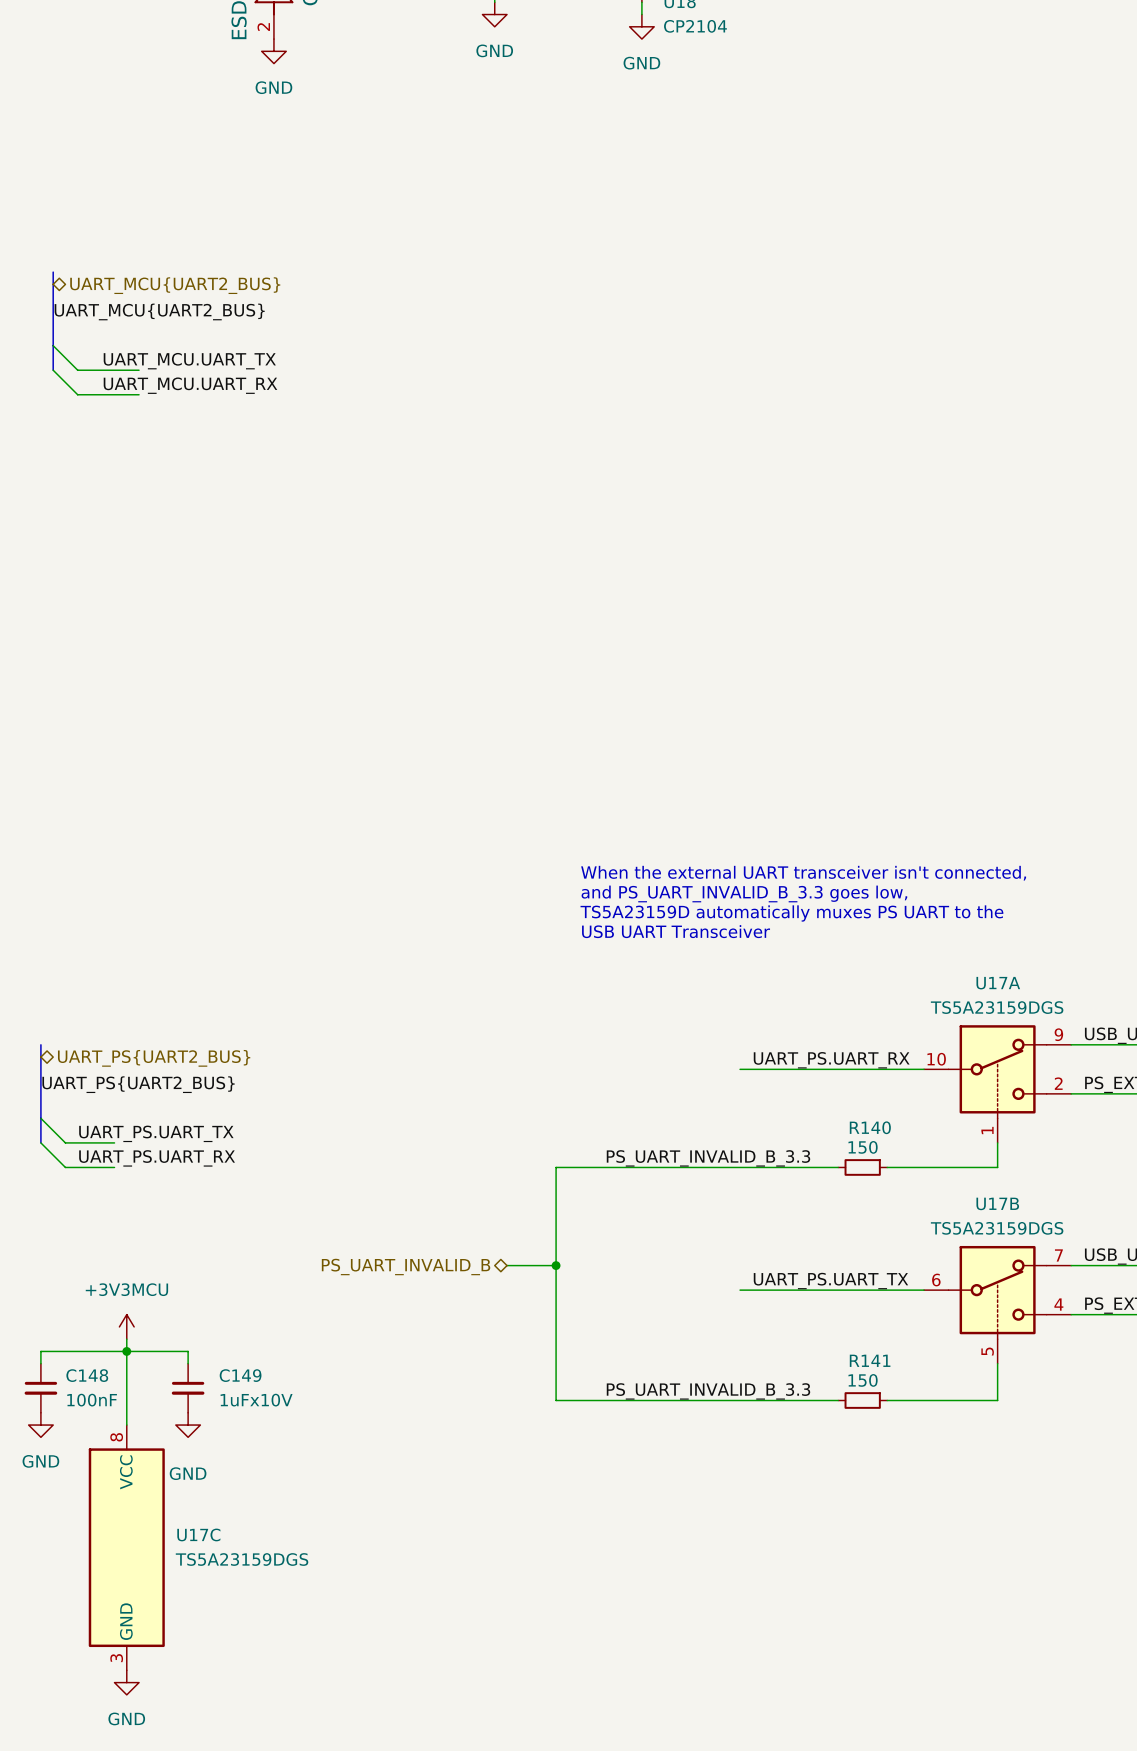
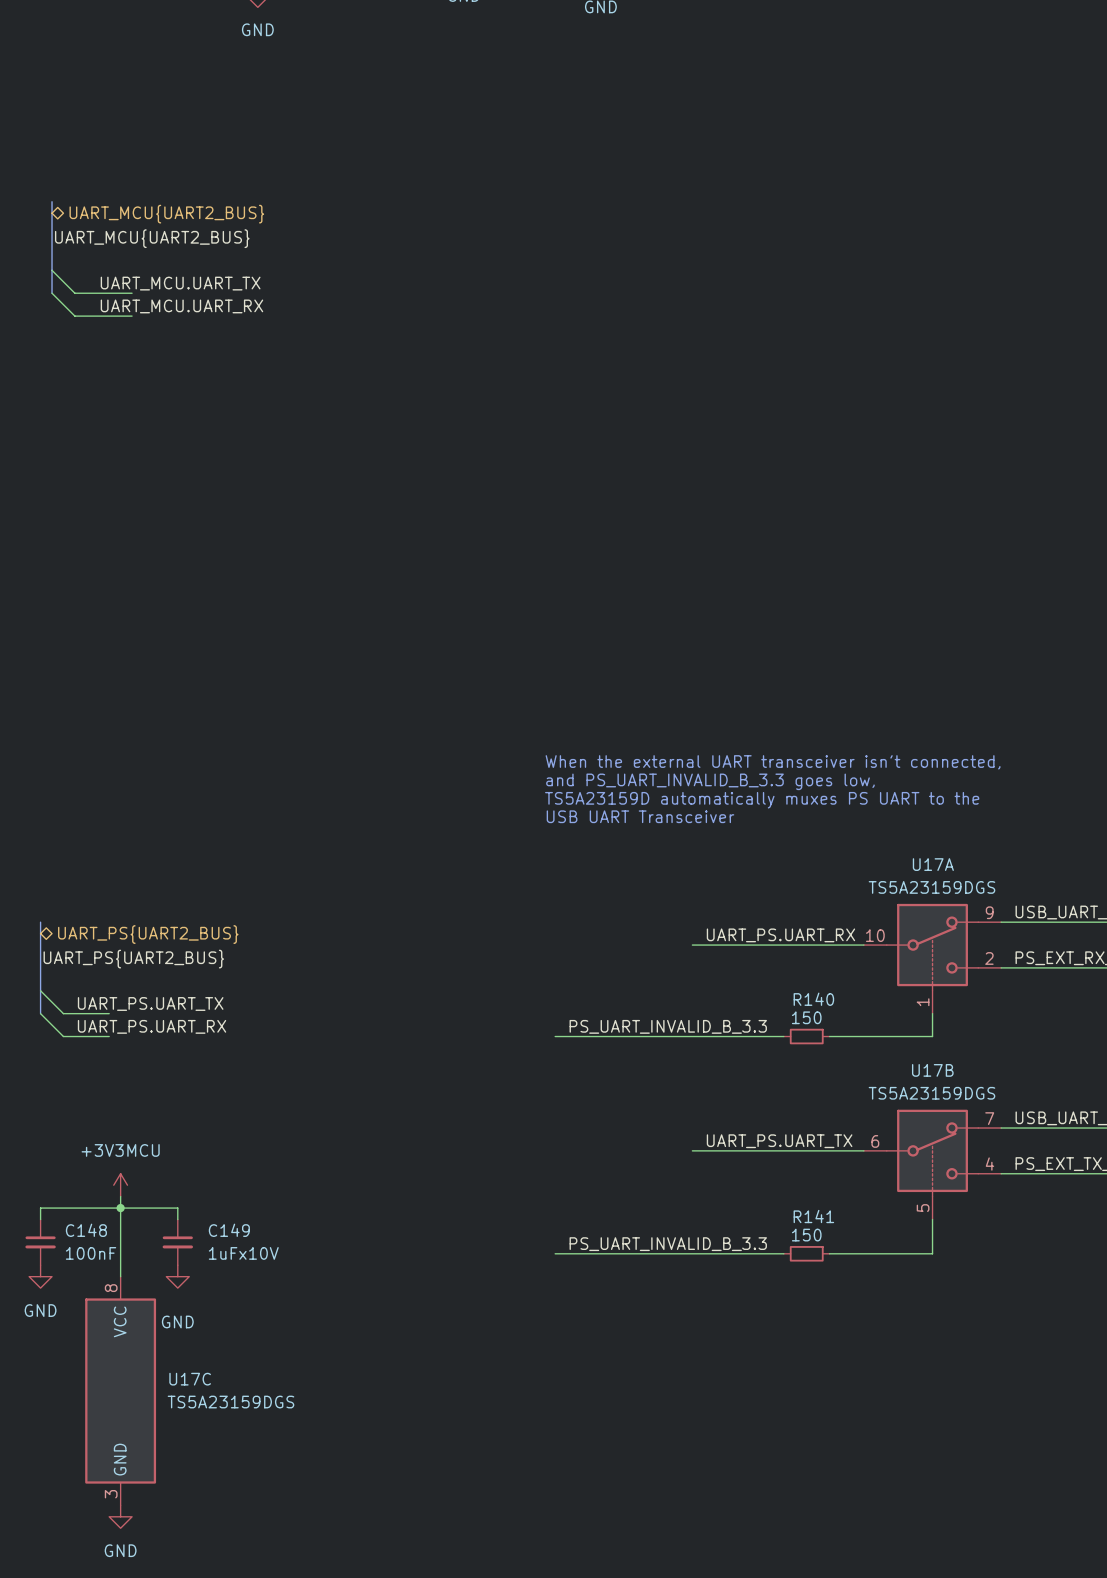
wire: (592, 1167) (556, 1167) (556, 1400) (592, 1400) -> none
wire: (507, 1265) (556, 1265) -> none
junction: (556, 1265) -> none
hierarchical label: PS_UART_INVALID_B (406, 1267) -> none

